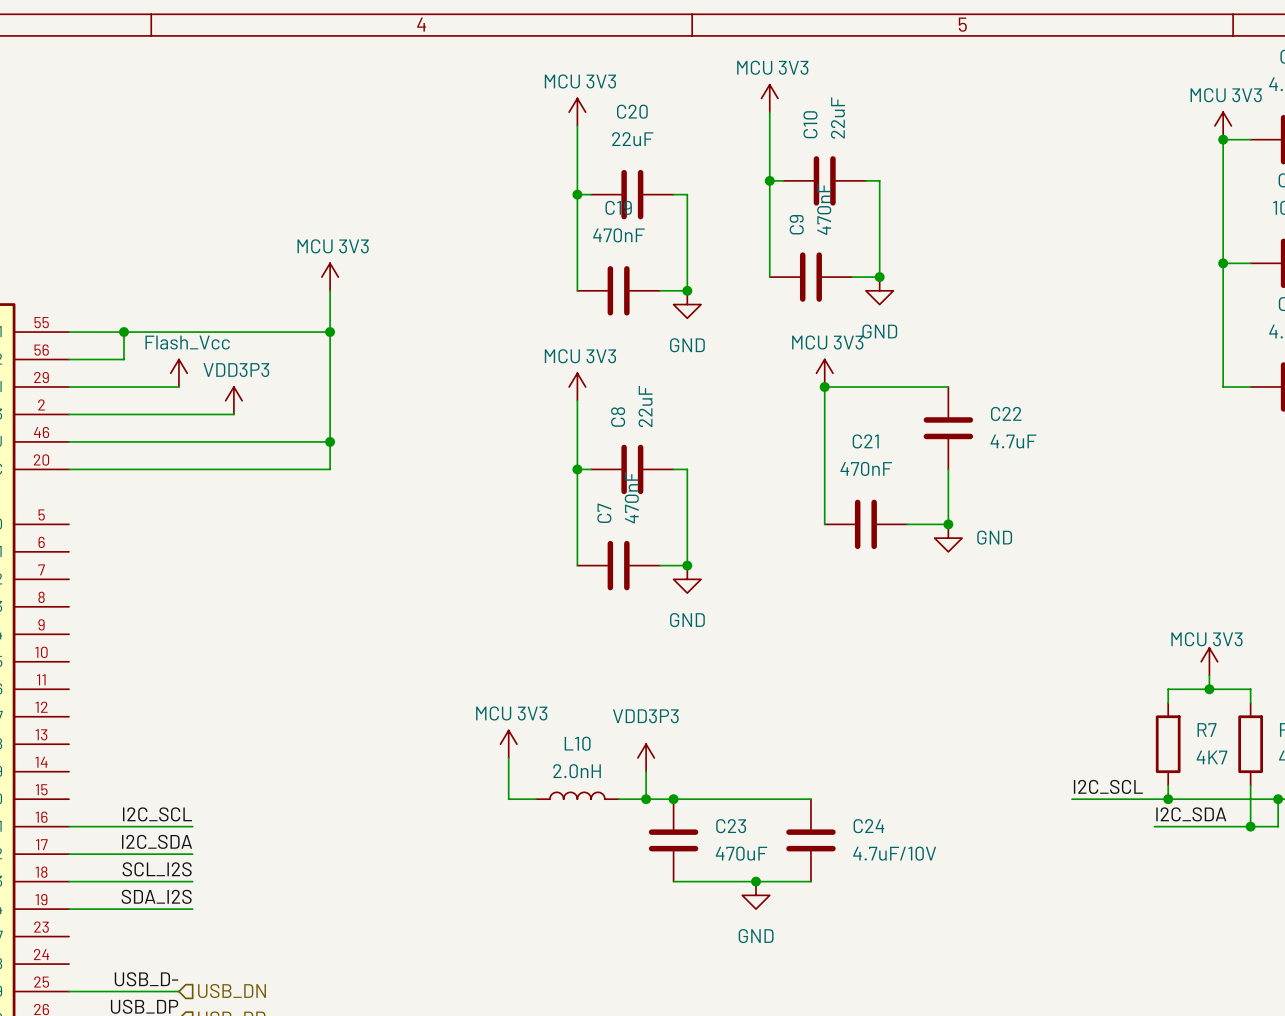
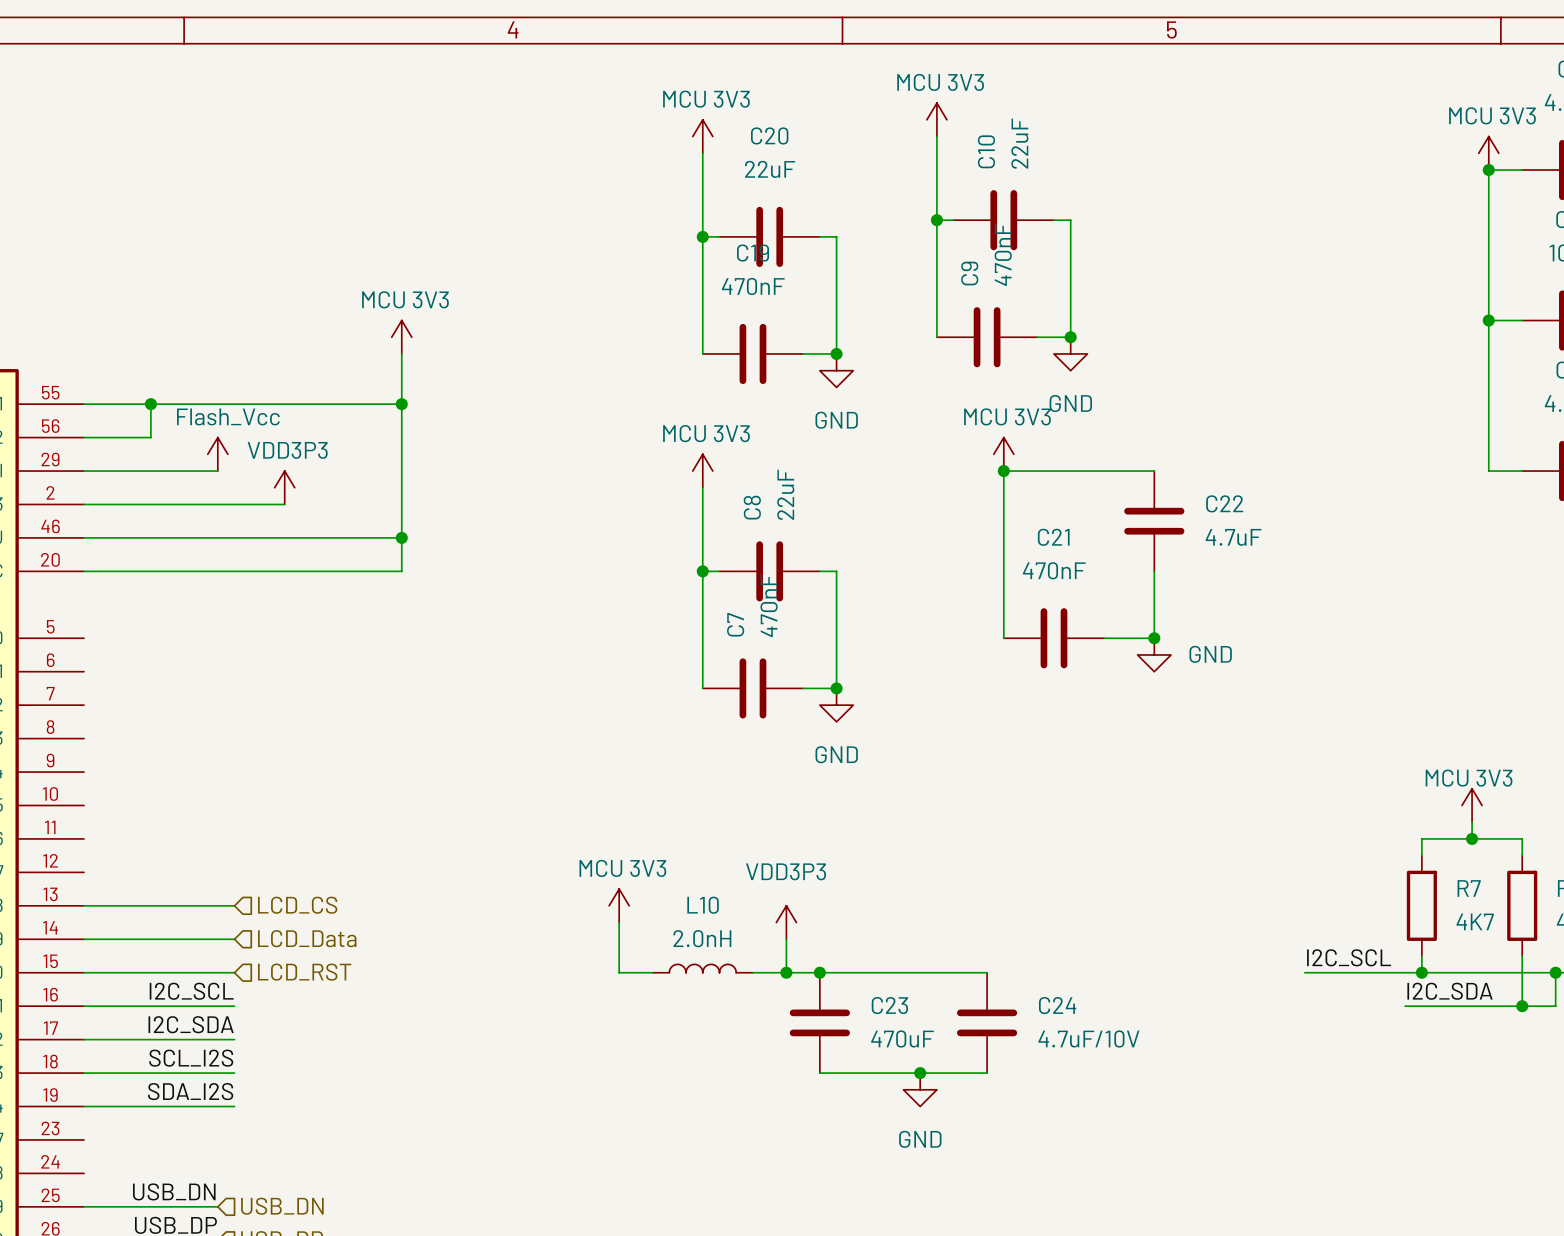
hierarchical label: none -> LCD_CS (297, 905)
wire: none -> (84, 905) (234, 905)
wire: none -> (84, 939) (234, 939)
hierarchical label: none -> LCD_Data (307, 938)
hierarchical label: none -> LCD_RST (304, 972)
wire: none -> (84, 972) (234, 972)
label: USB_D- (146, 979) -> USB_DN (174, 1191)

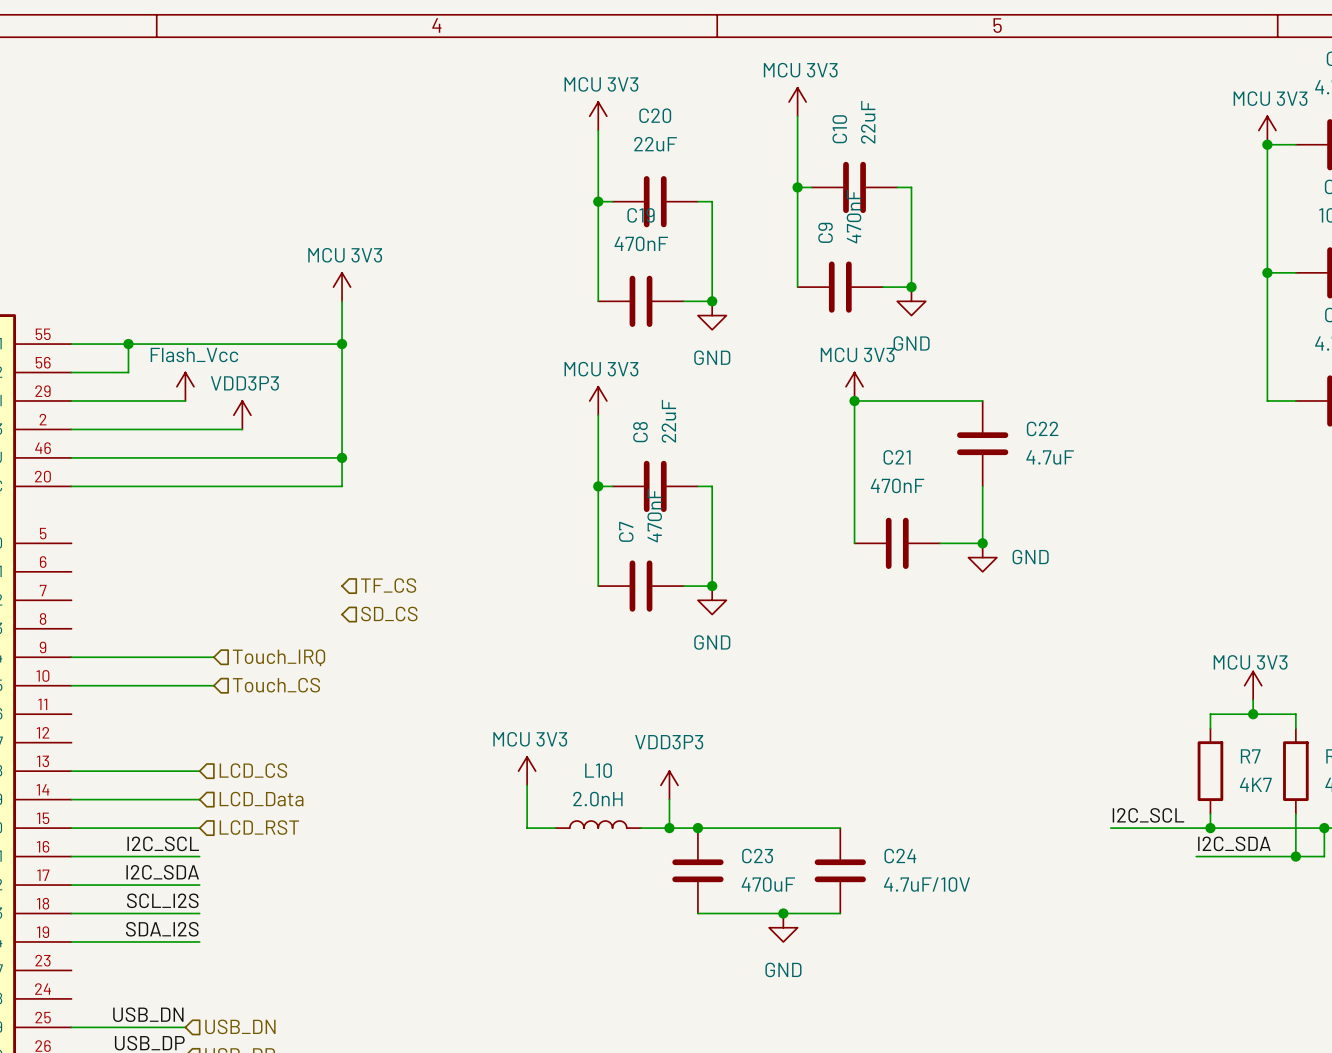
hierarchical label: none -> TF_CS (388, 585)
hierarchical label: none -> SD_CS (389, 614)
wire: none -> (71, 657) (213, 657)
hierarchical label: none -> Touch_IRQ (279, 657)
hierarchical label: none -> Touch_CS (276, 685)
wire: none -> (71, 685) (213, 685)

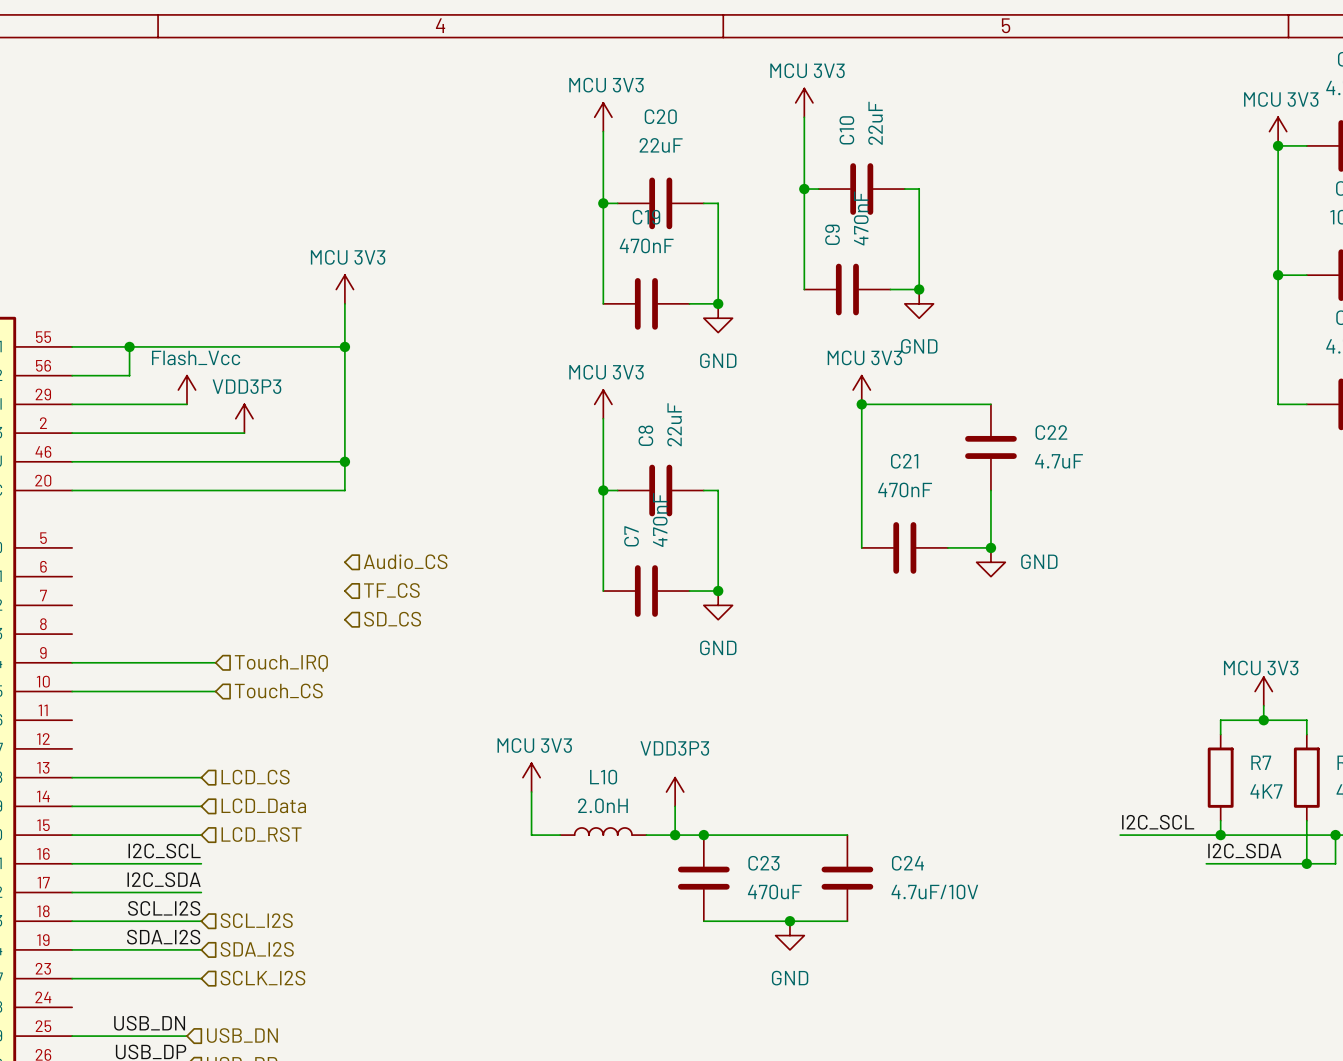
hierarchical label: none -> Audio_CS (405, 561)
hierarchical label: none -> SCL_I2S (256, 920)
hierarchical label: none -> SDA_I2S (257, 949)
hierarchical label: none -> SCLK_I2S (262, 978)
wire: none -> (72, 978) (201, 978)

